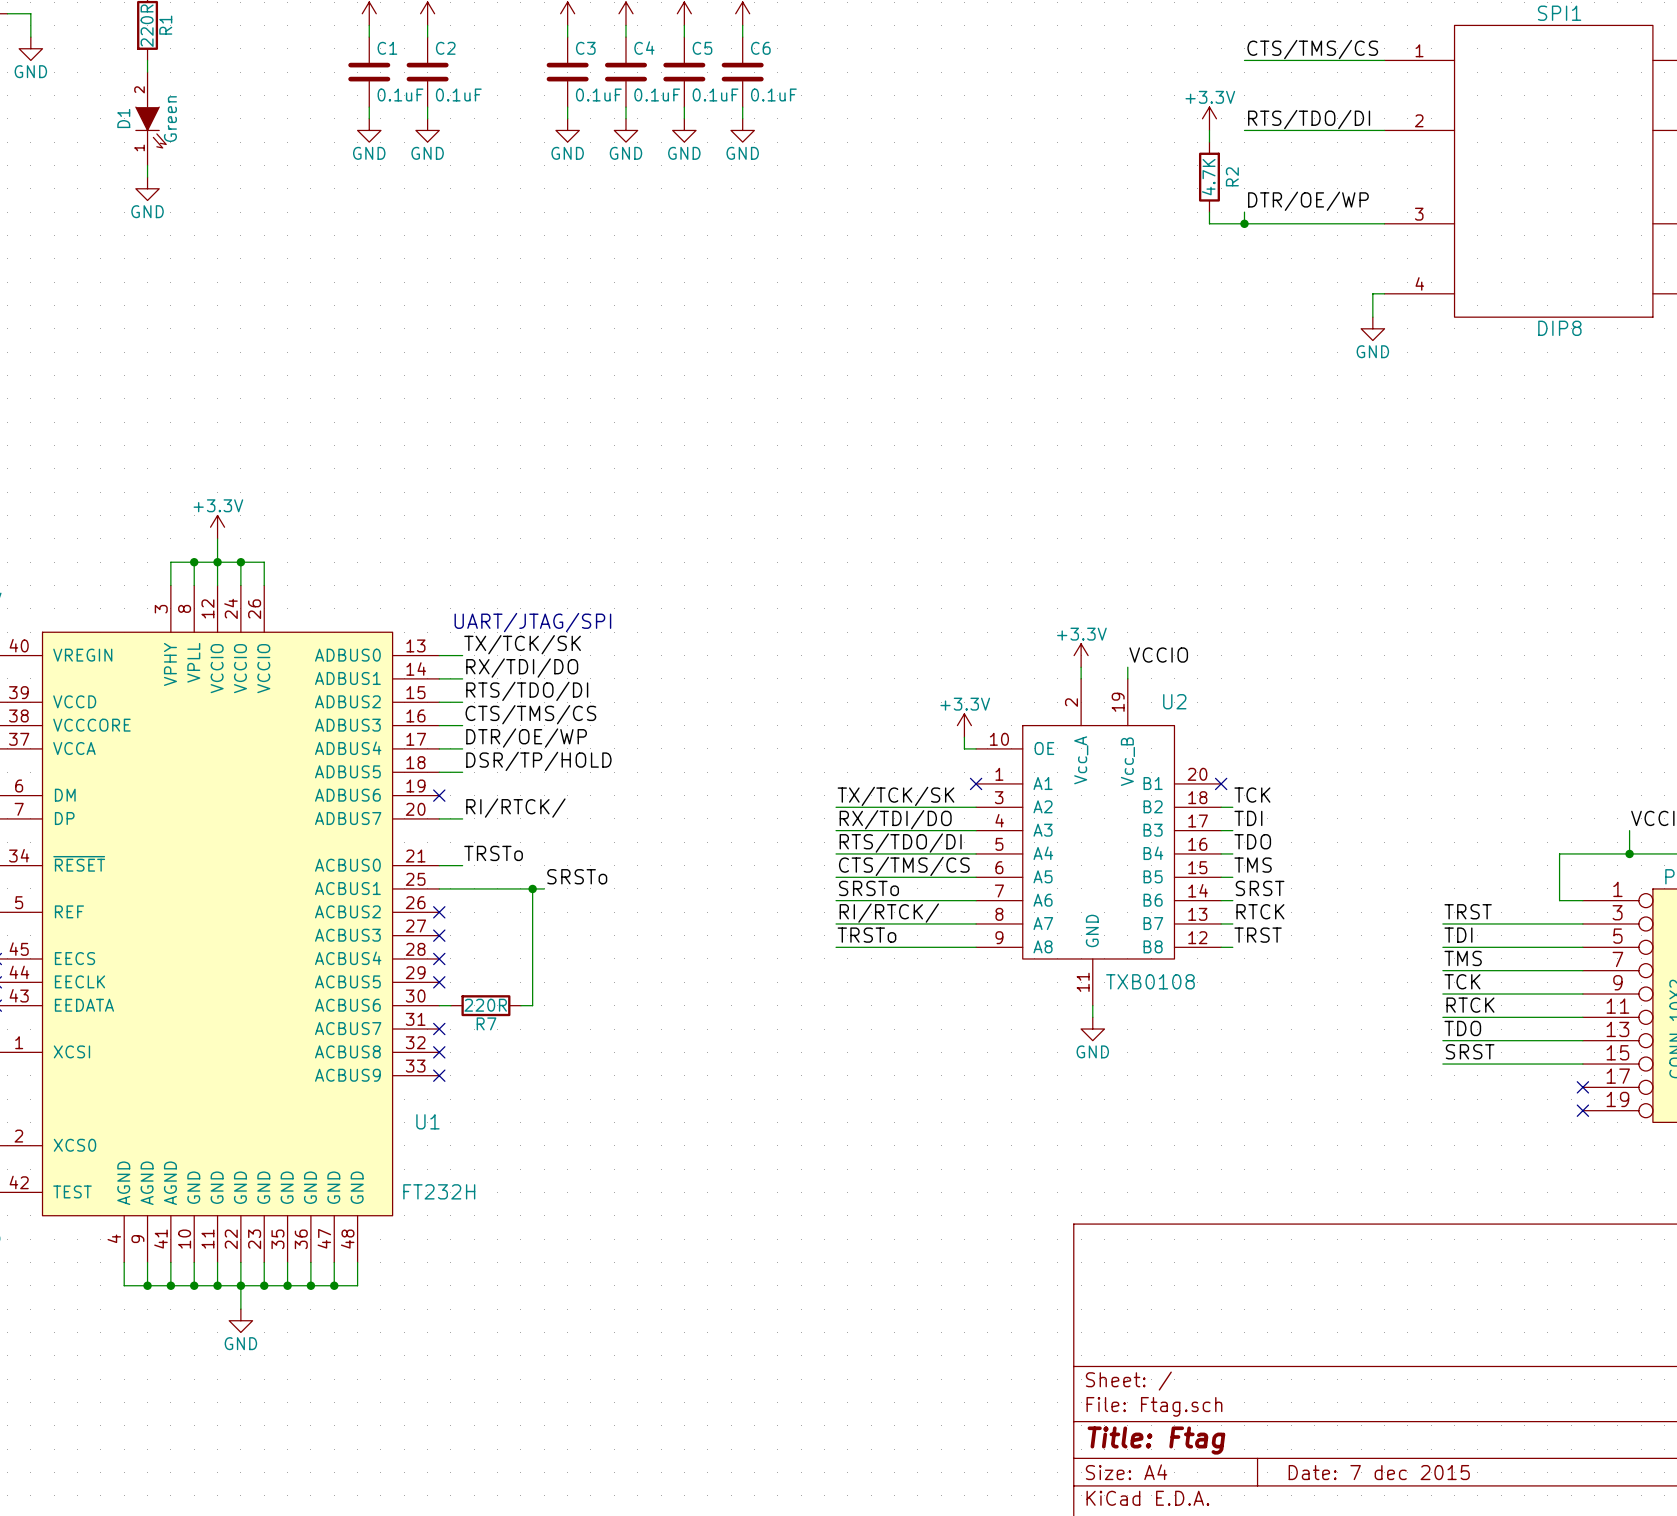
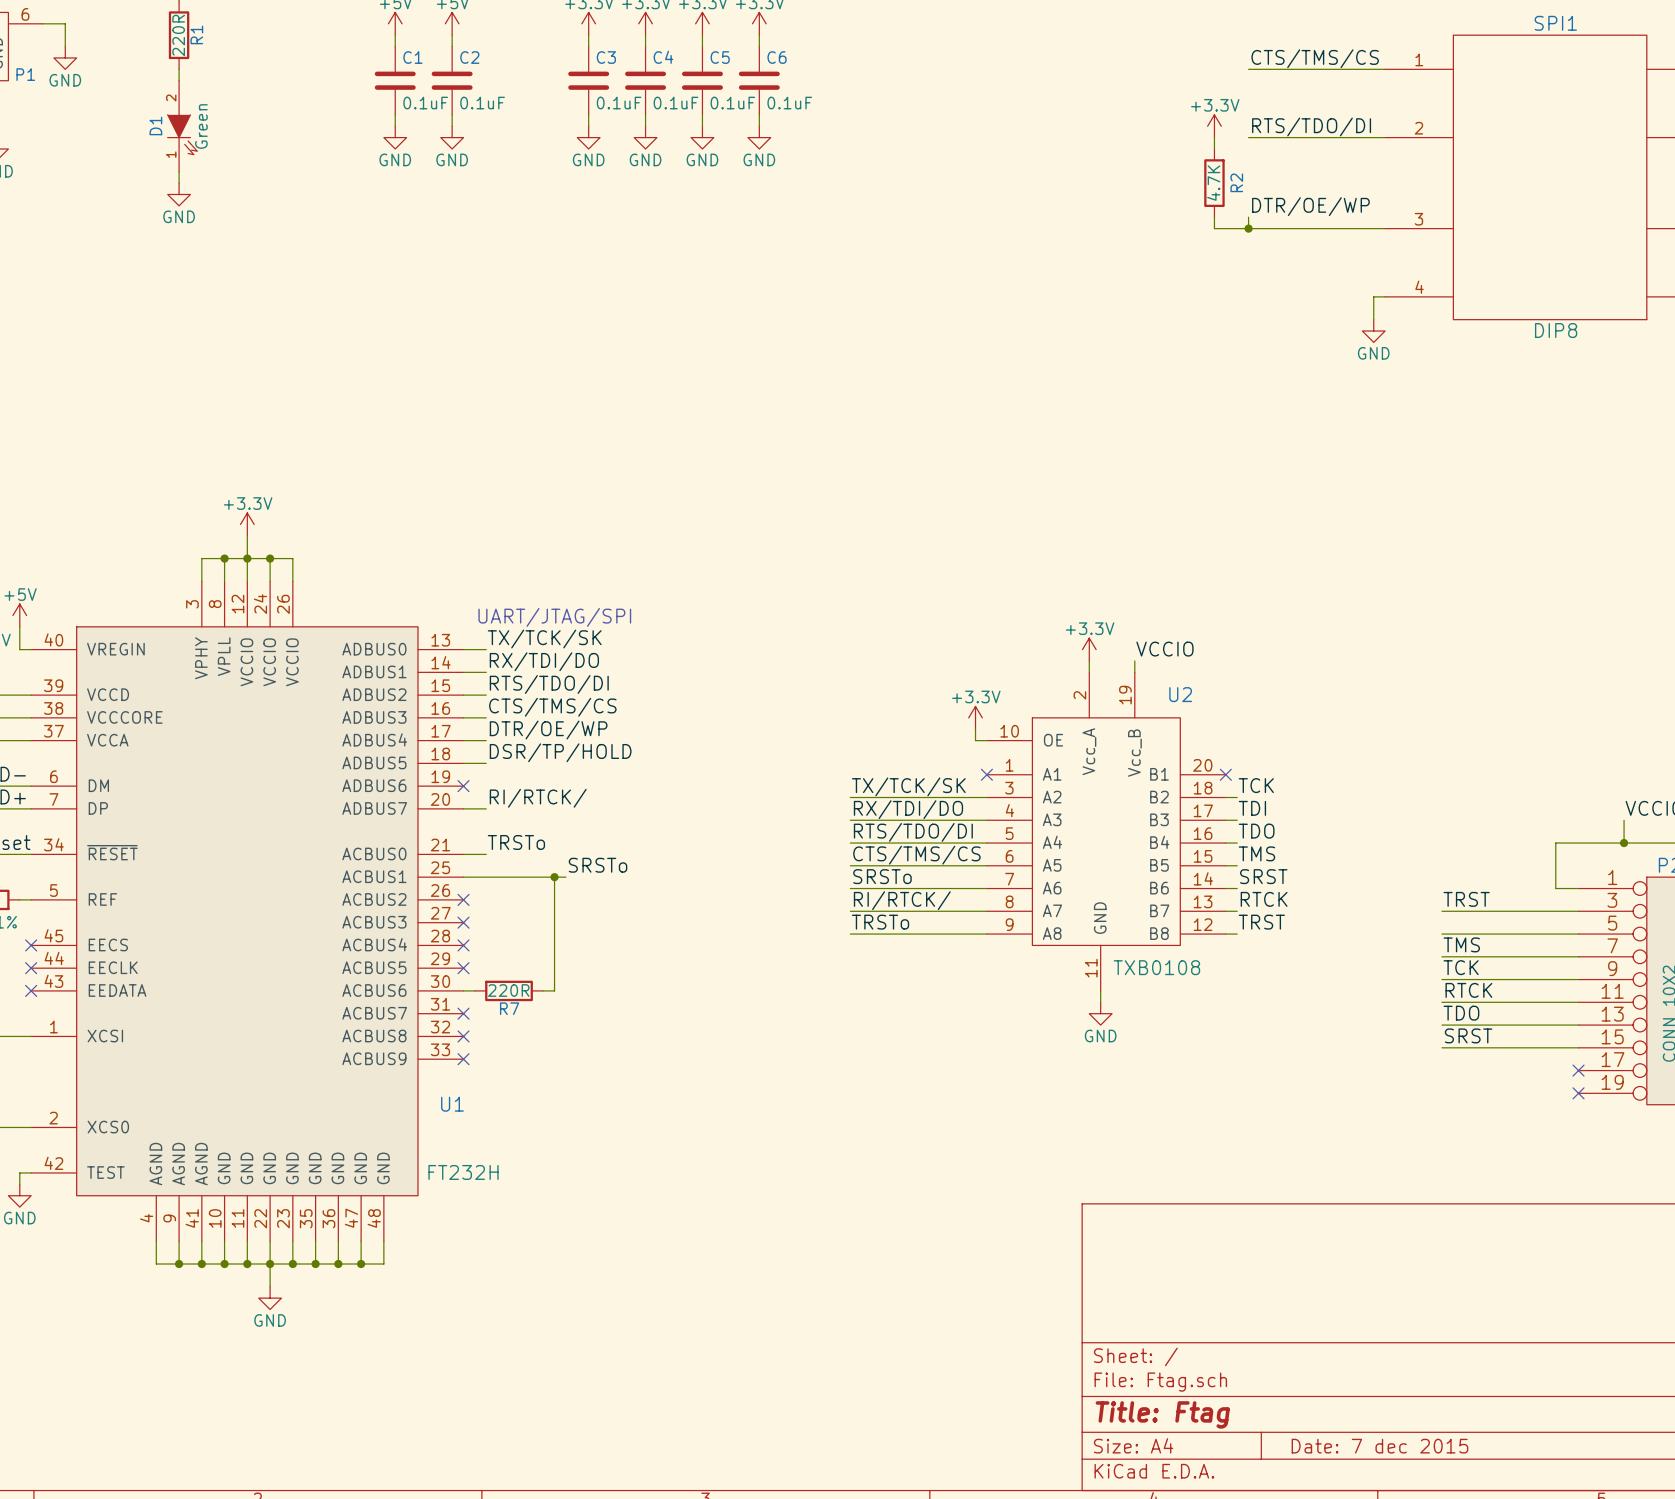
label: TDI (1458, 935) -> none

